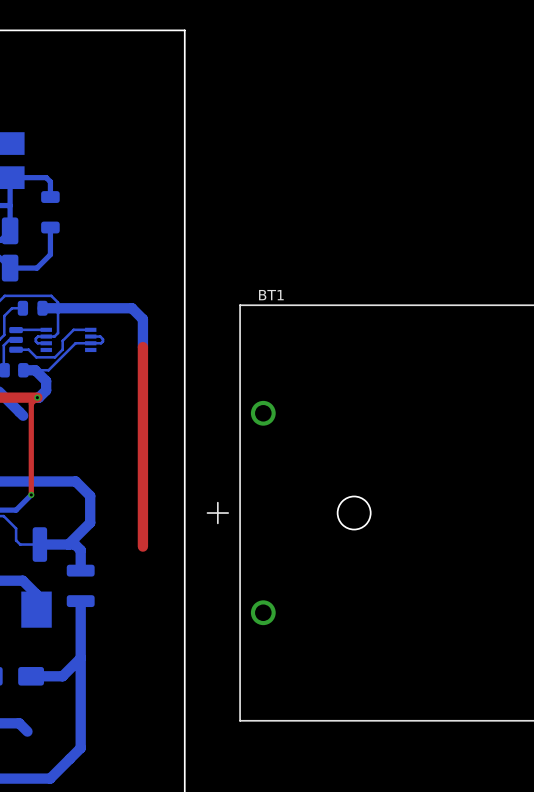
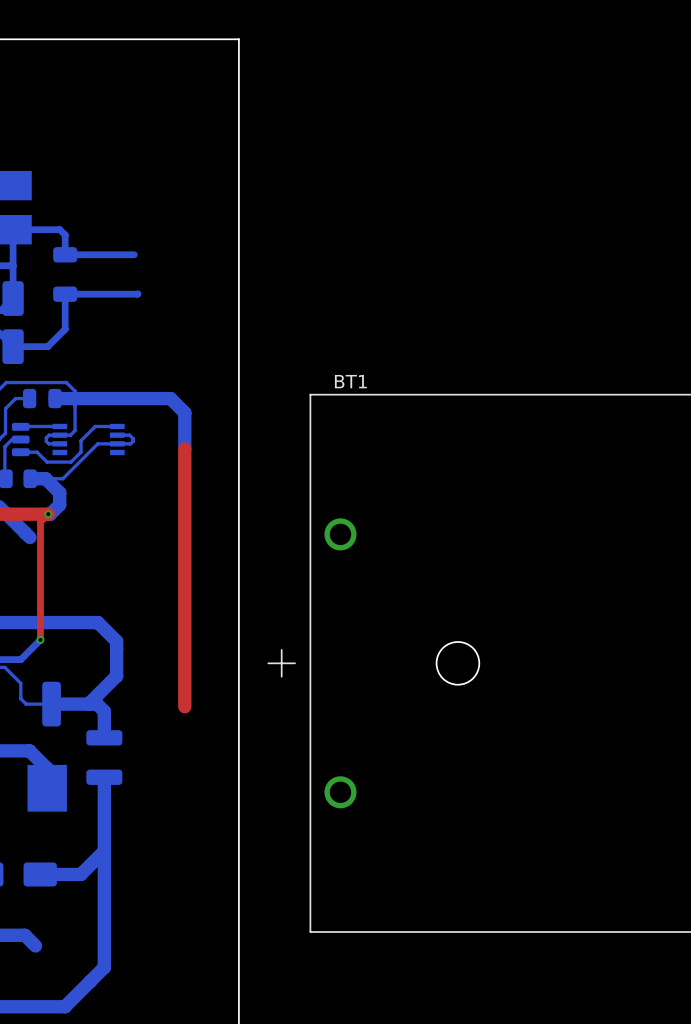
bottom track: none -> (65, 254) (134, 254)
bottom track: none -> (138, 293) (65, 294)

